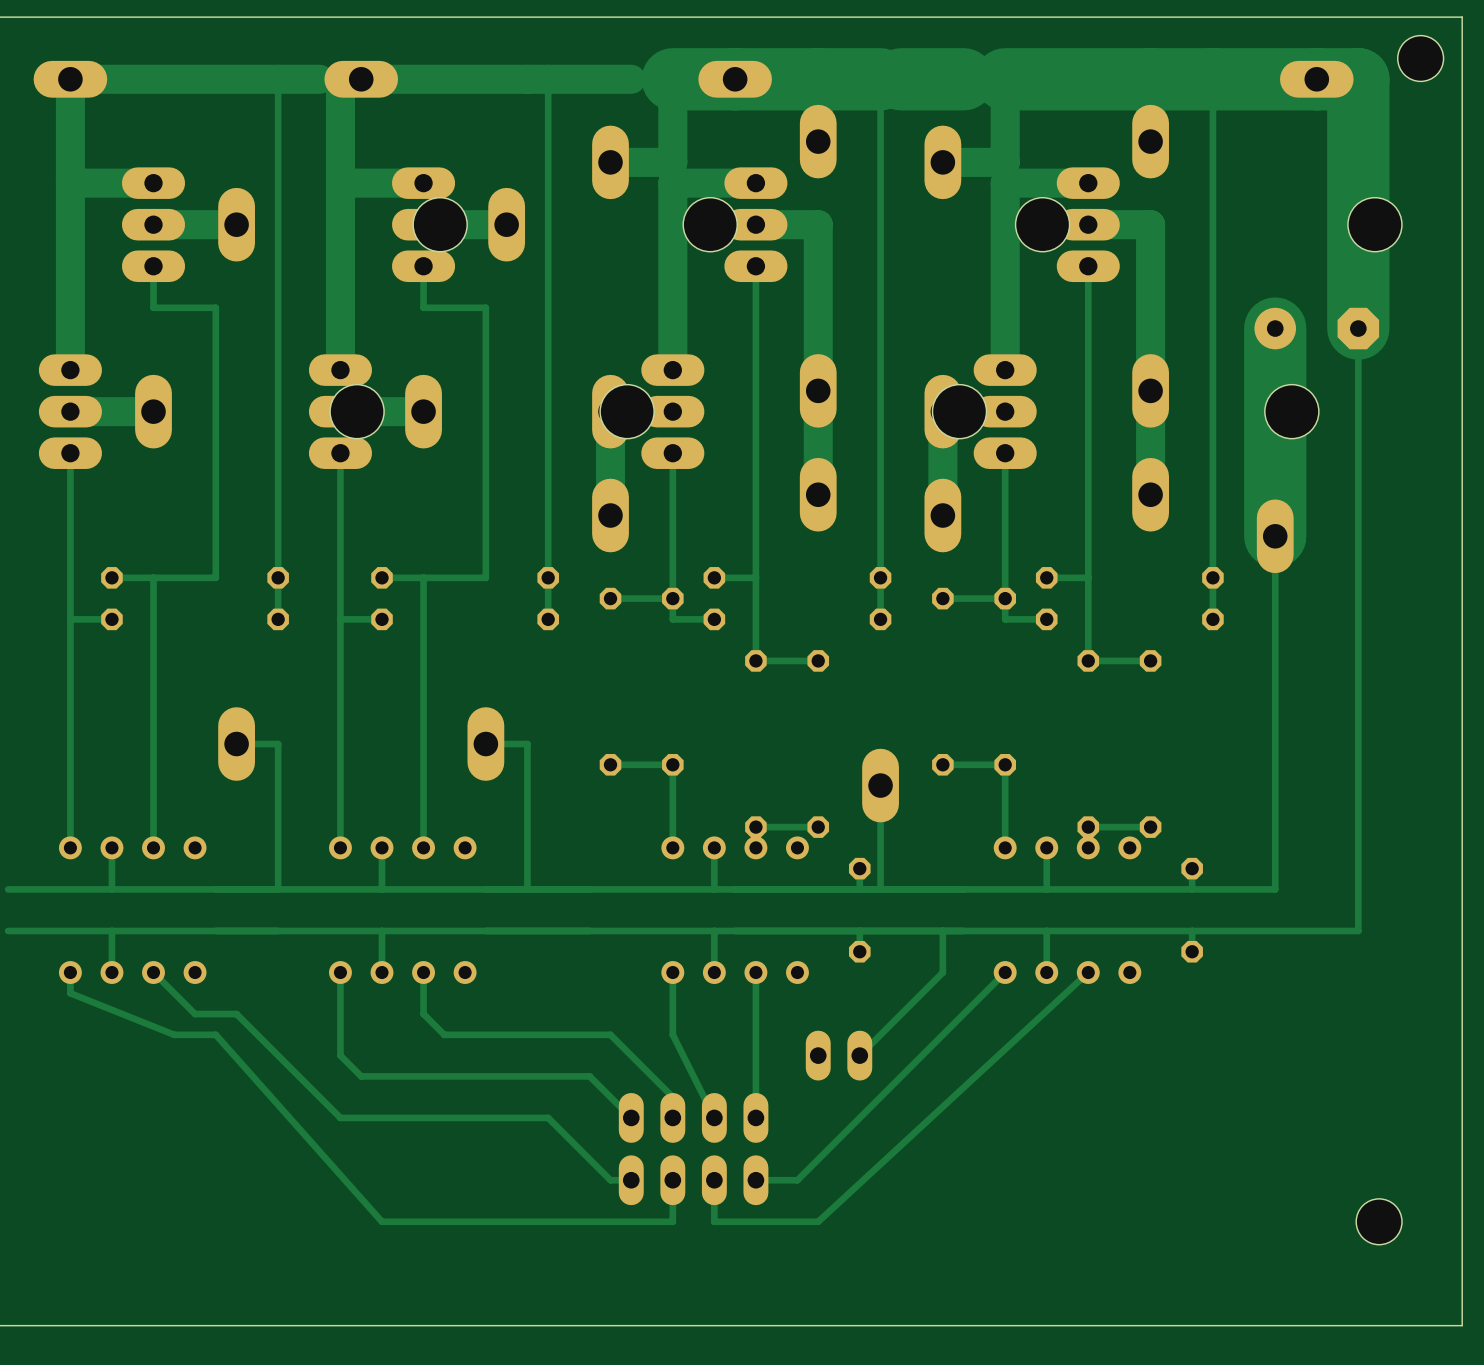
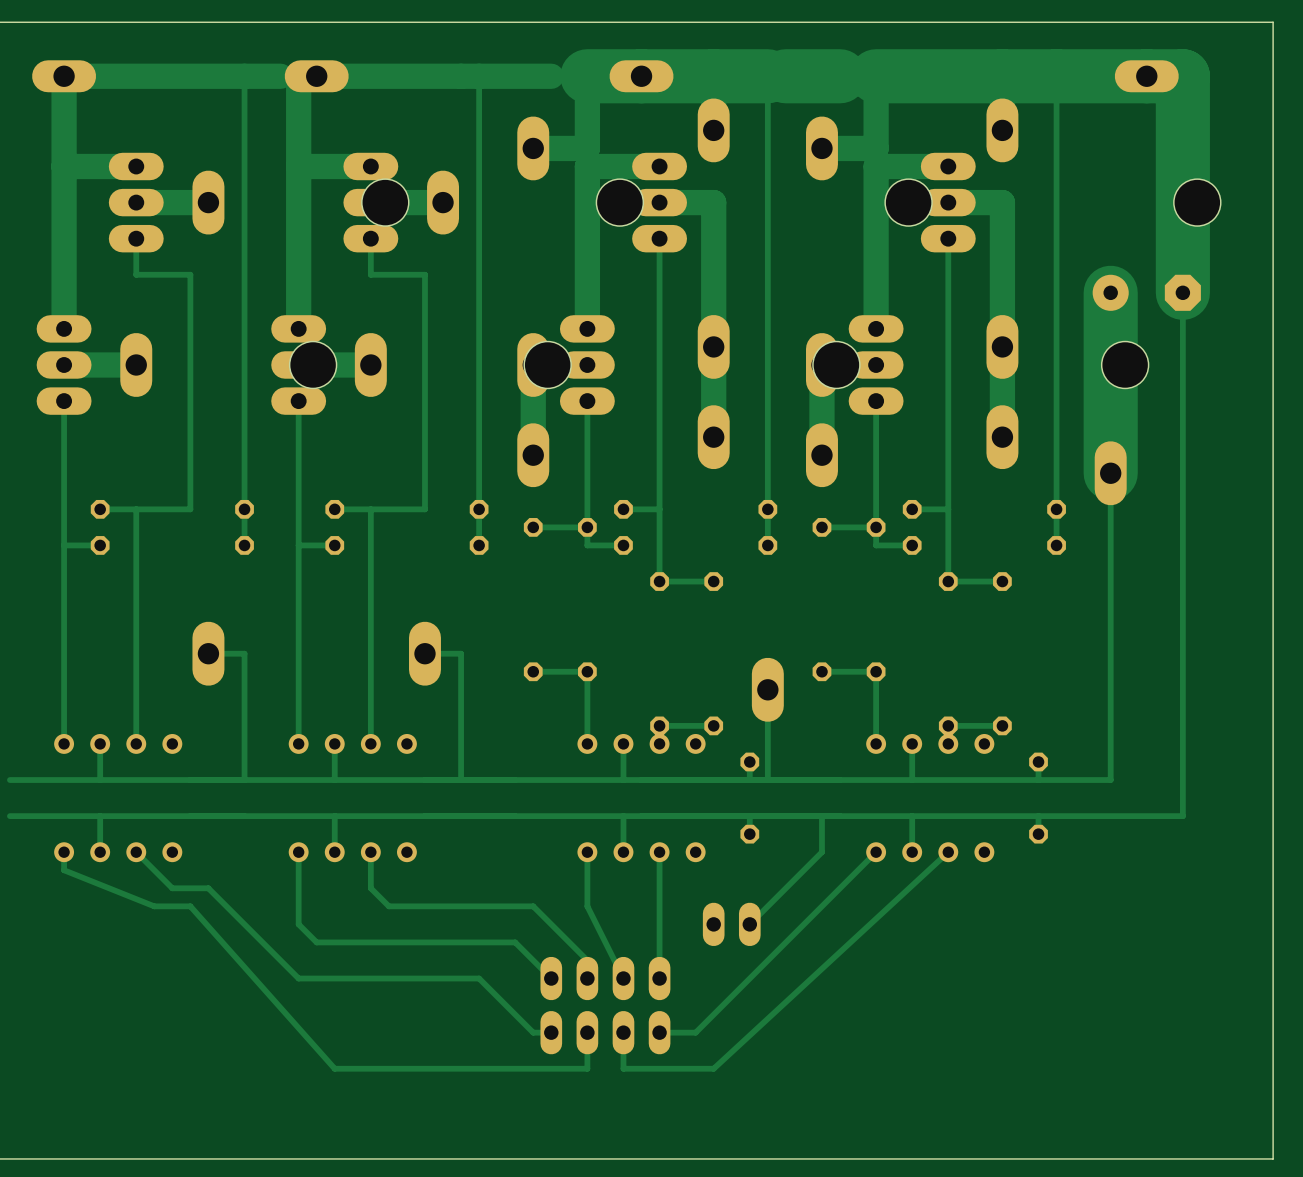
hole: (1420, 58) -> none
hole: (1379, 1221) -> none

